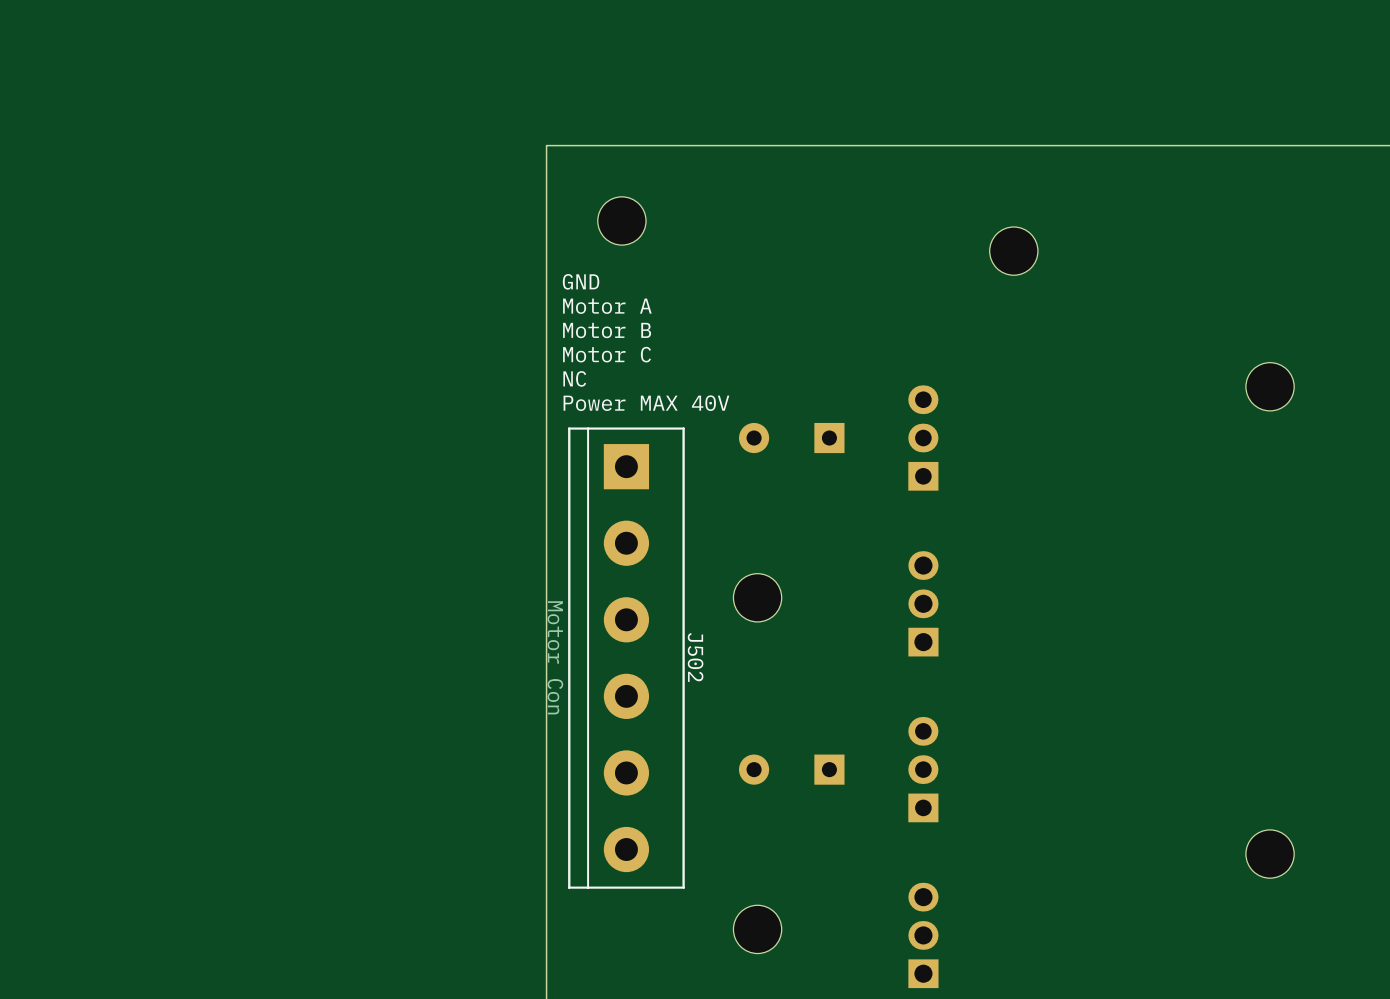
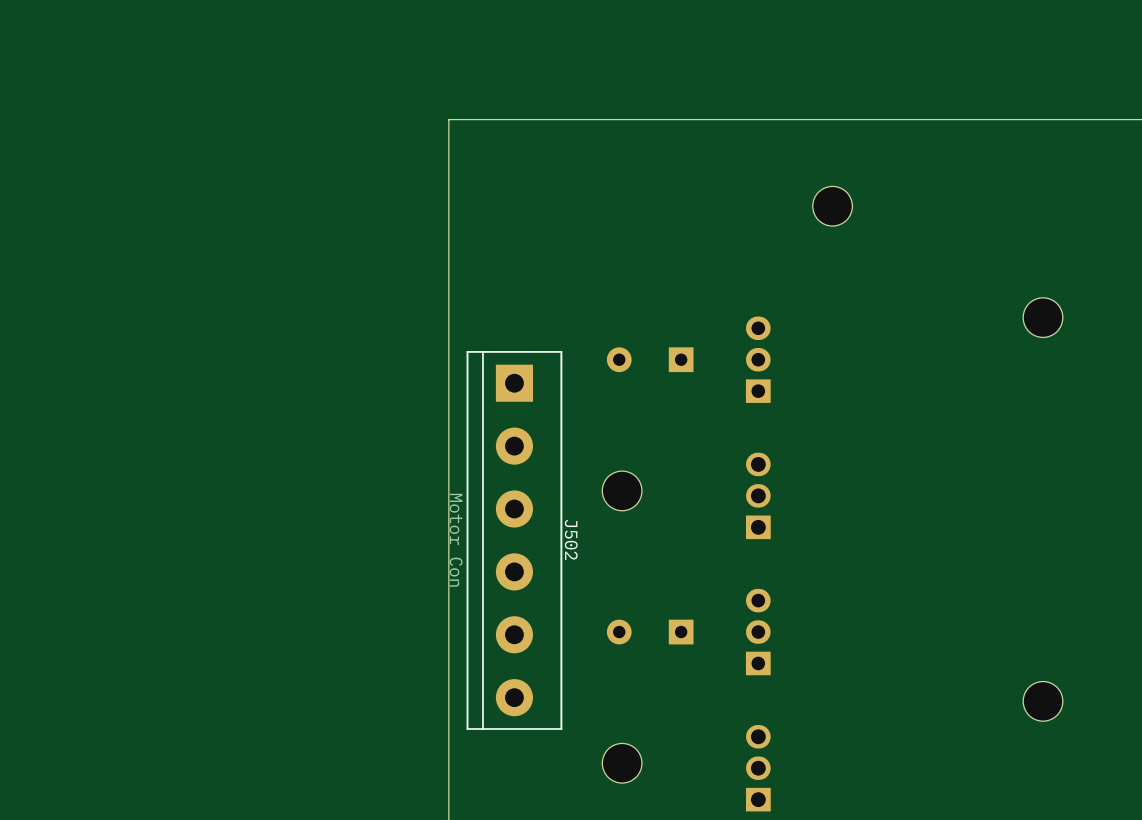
part: (621, 220) -> none
text: GND (581, 281) -> none
text: Motor A (607, 306) -> none
text: Motor B (607, 330) -> none
text: Motor C (607, 354) -> none
text: NC (574, 378) -> none
text: Power MAX 40V (646, 403) -> none

